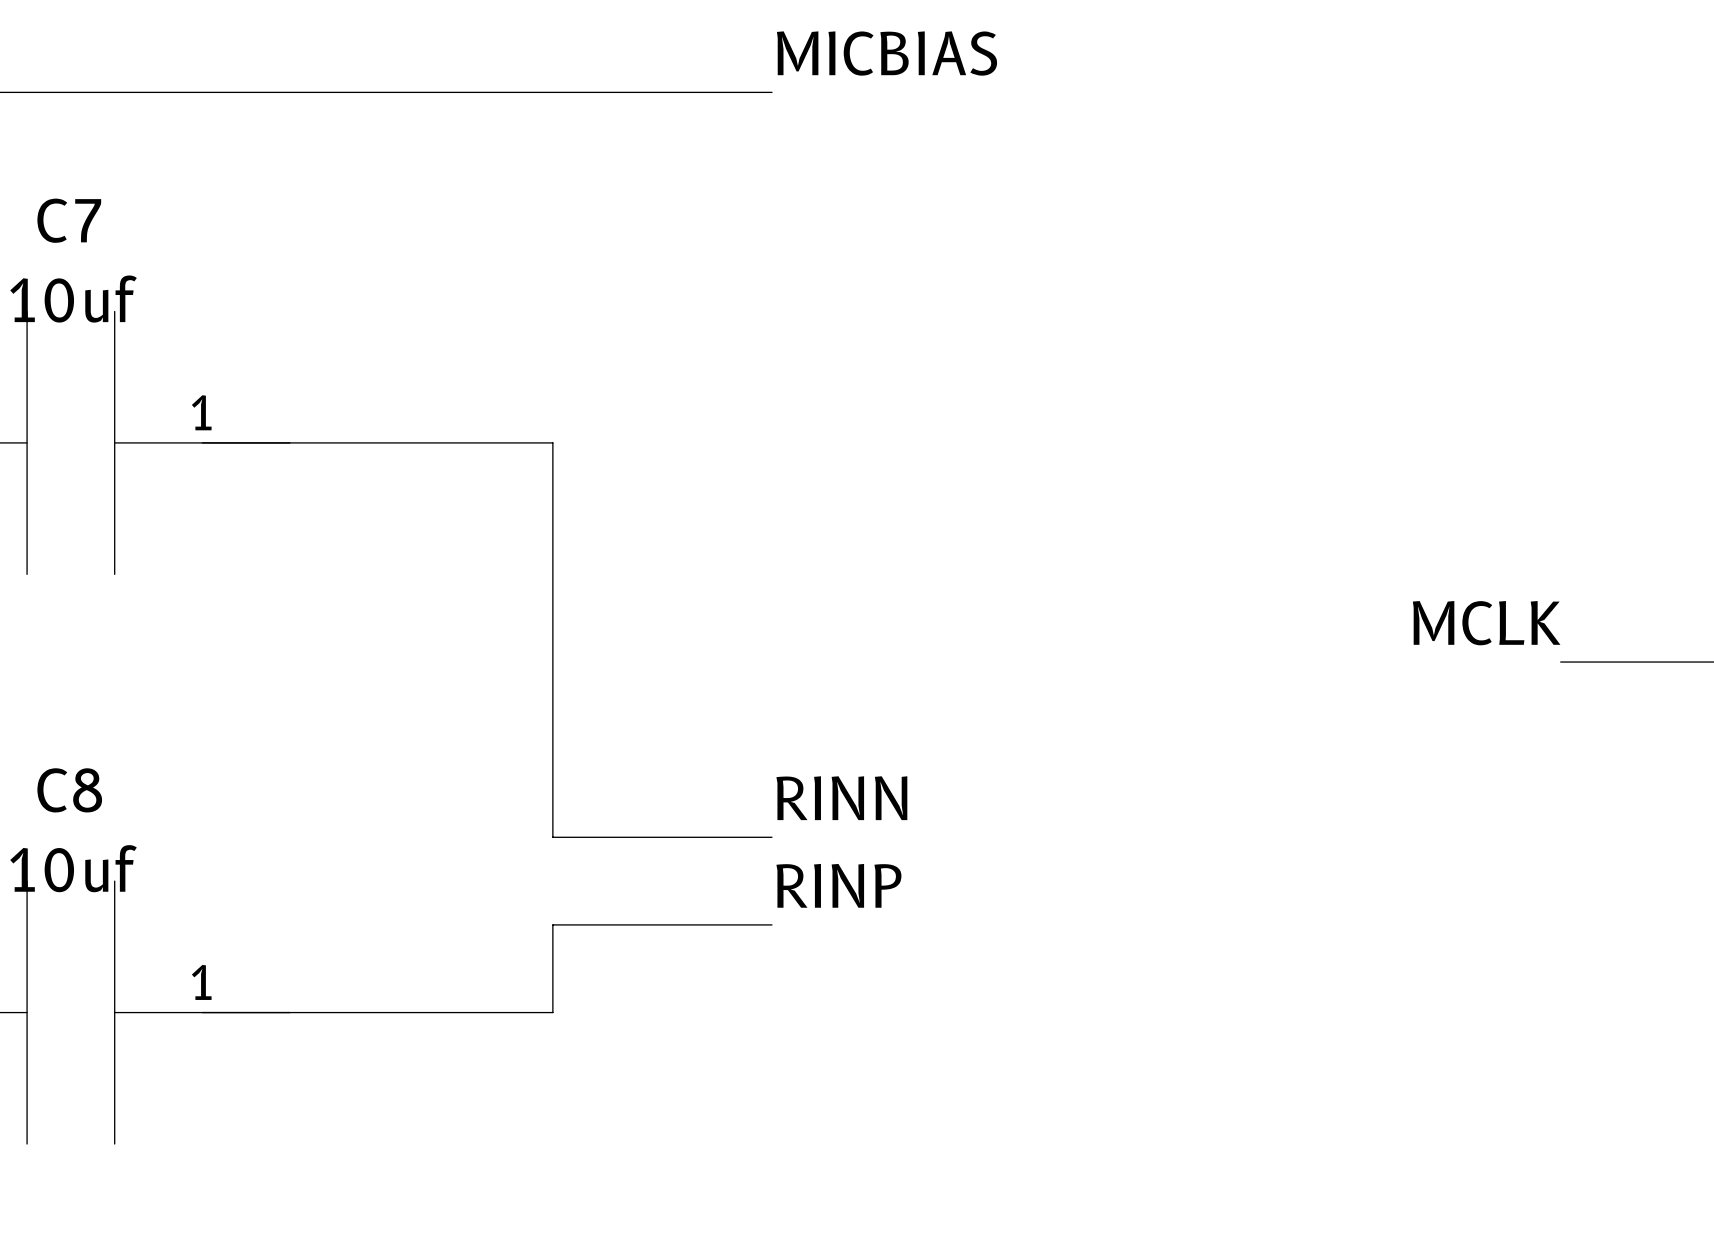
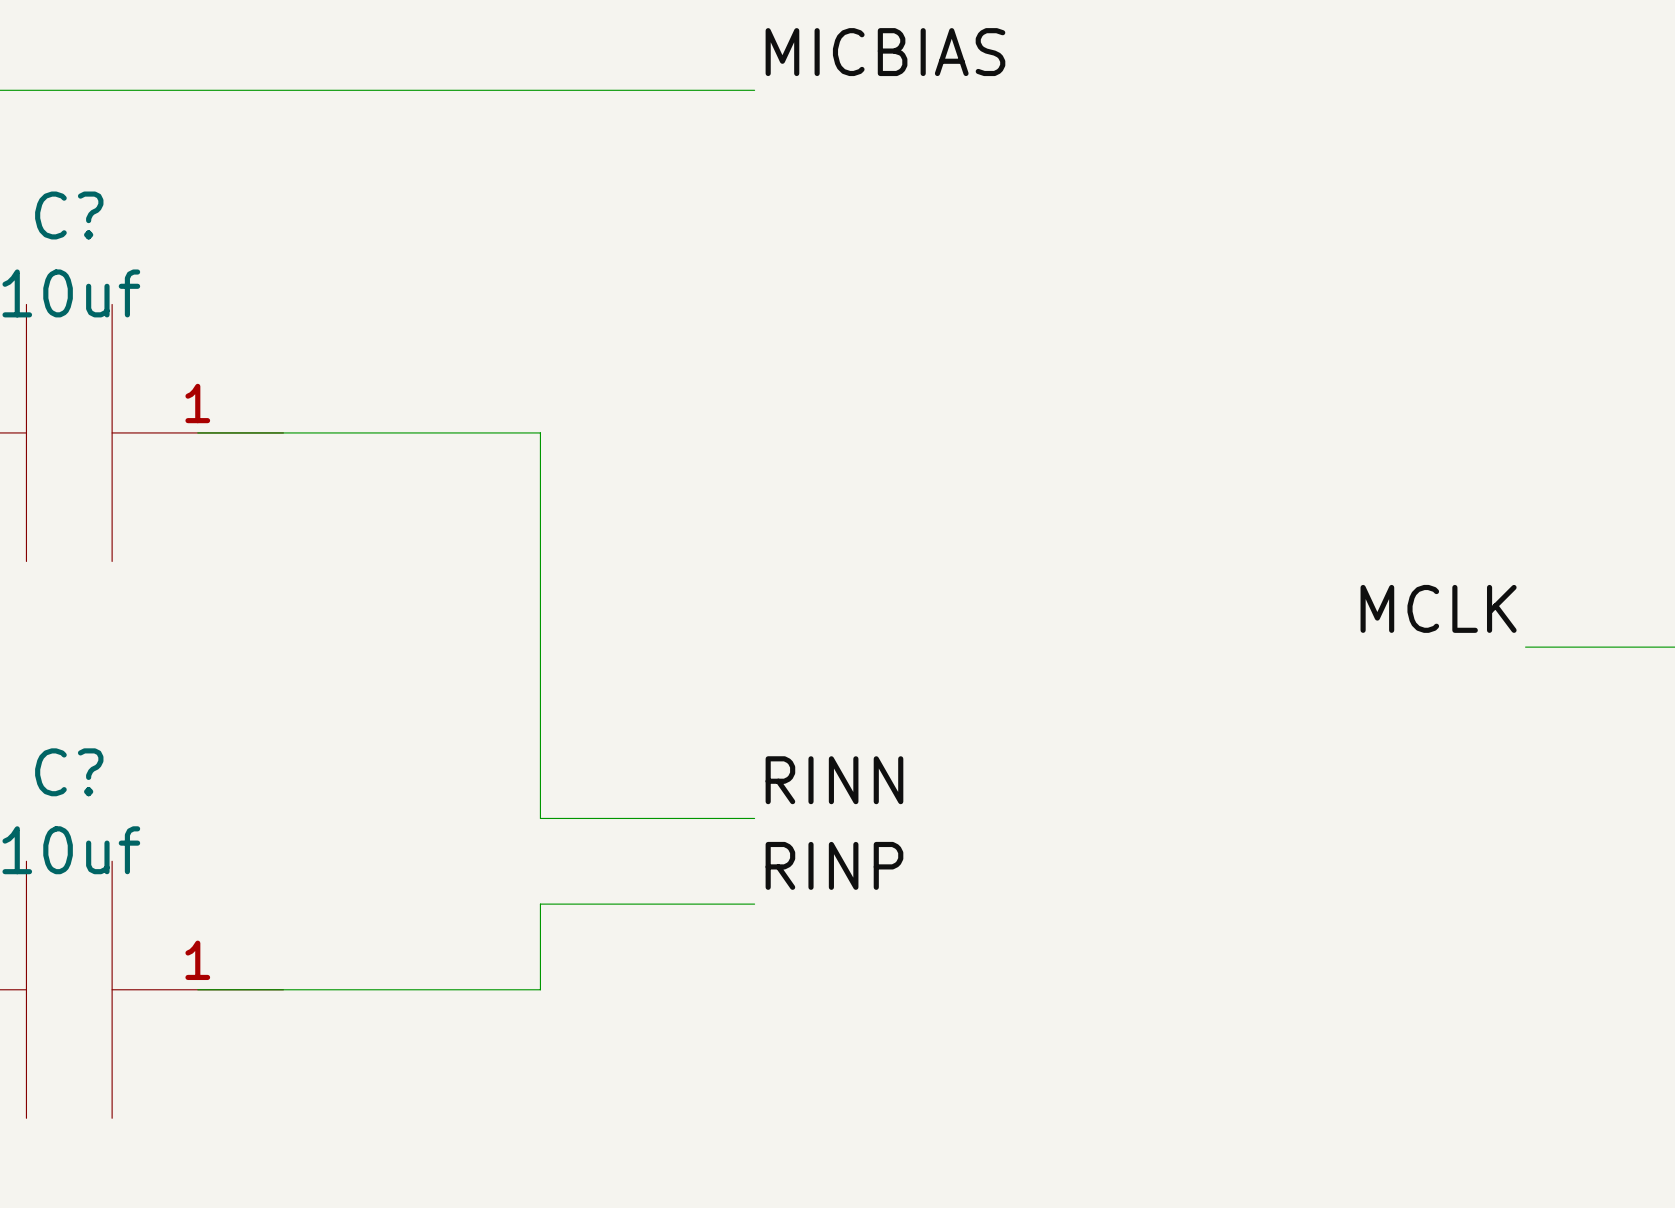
C7 name: C7 (69, 220) -> C? (69, 215)
C8 name: C8 (69, 790) -> C? (69, 772)

